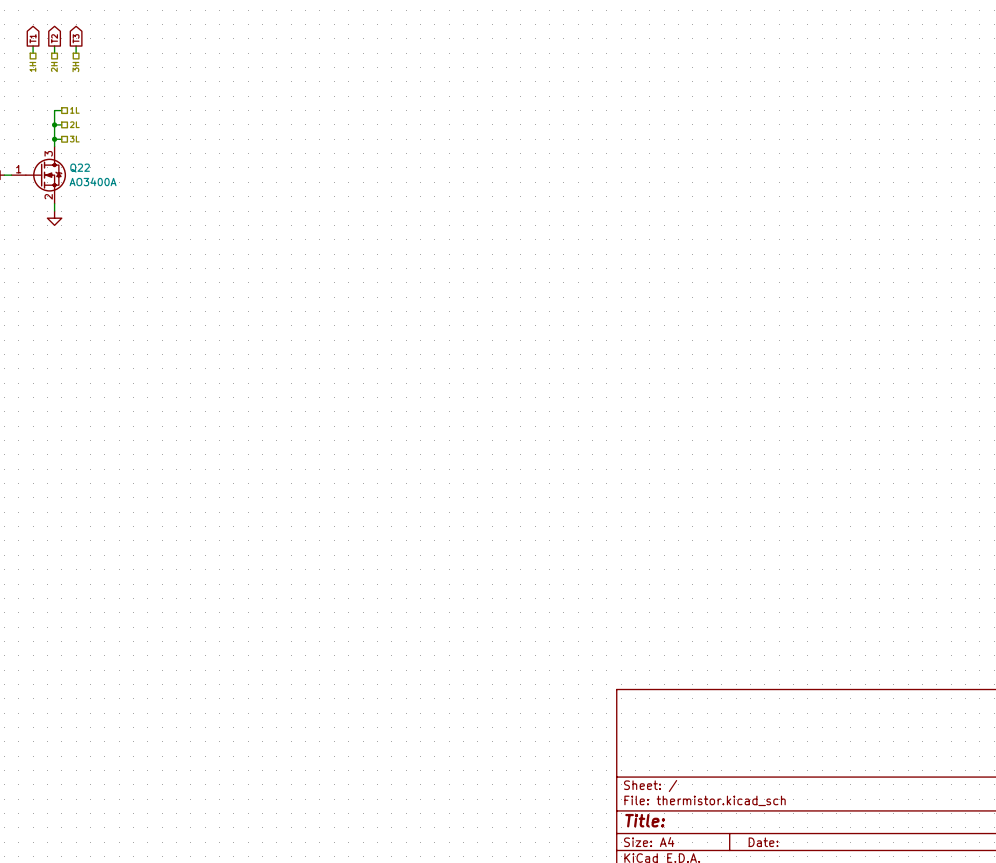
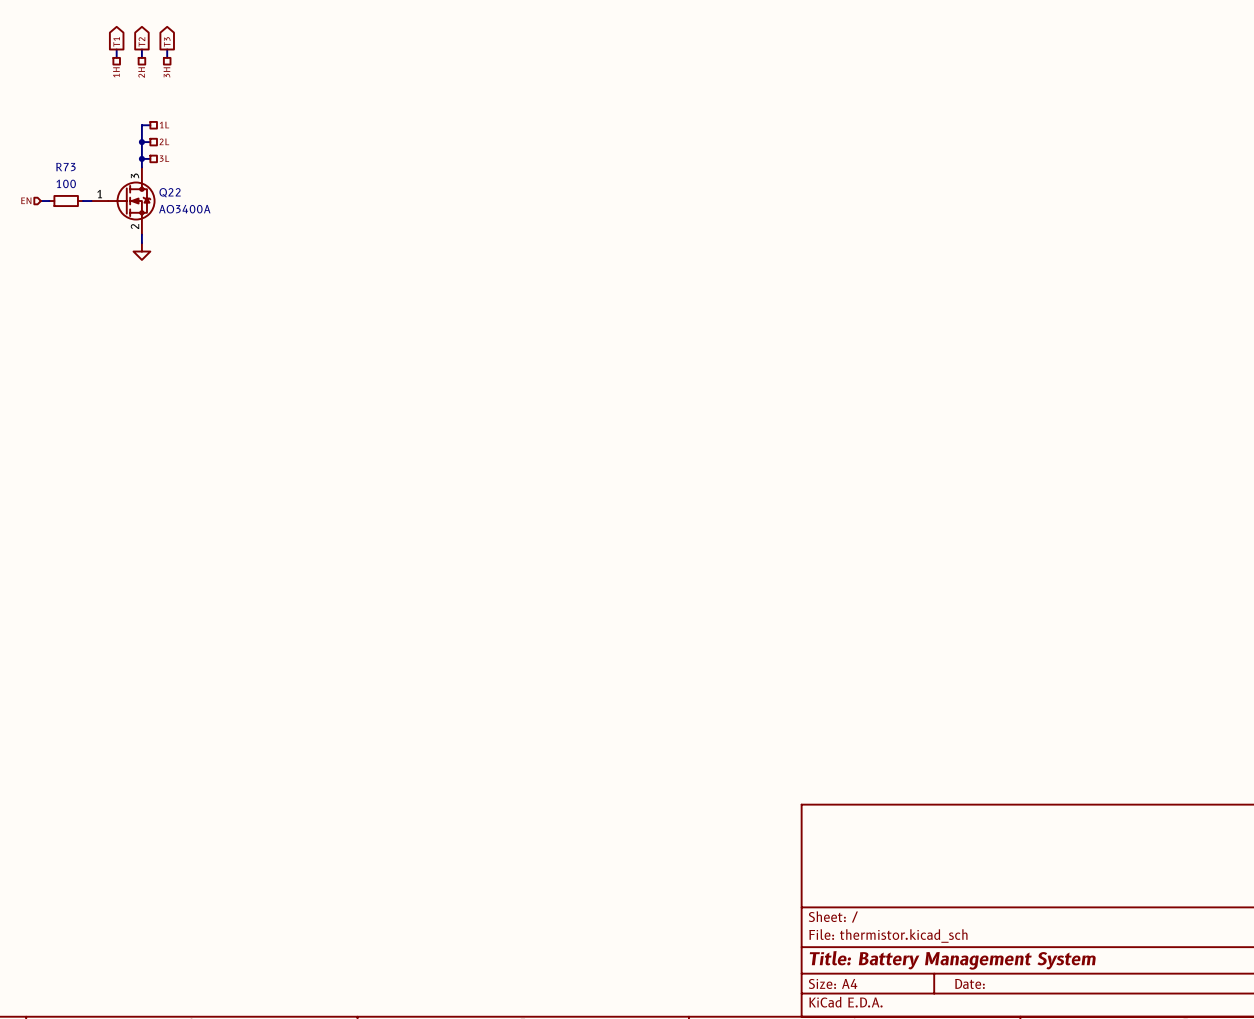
title block: Title: (645, 820) -> Title: Battery Management System (952, 960)

